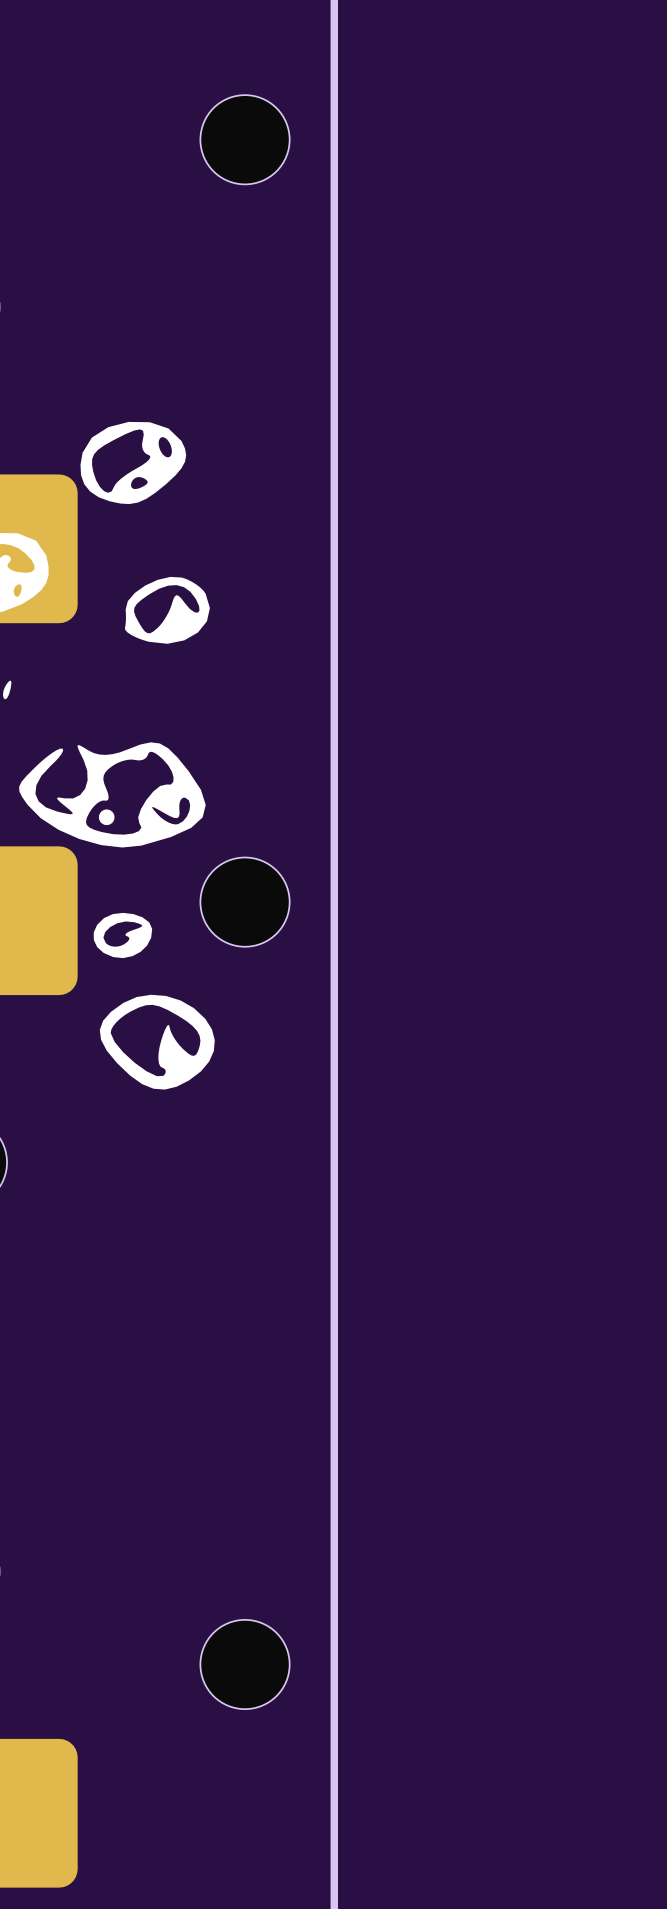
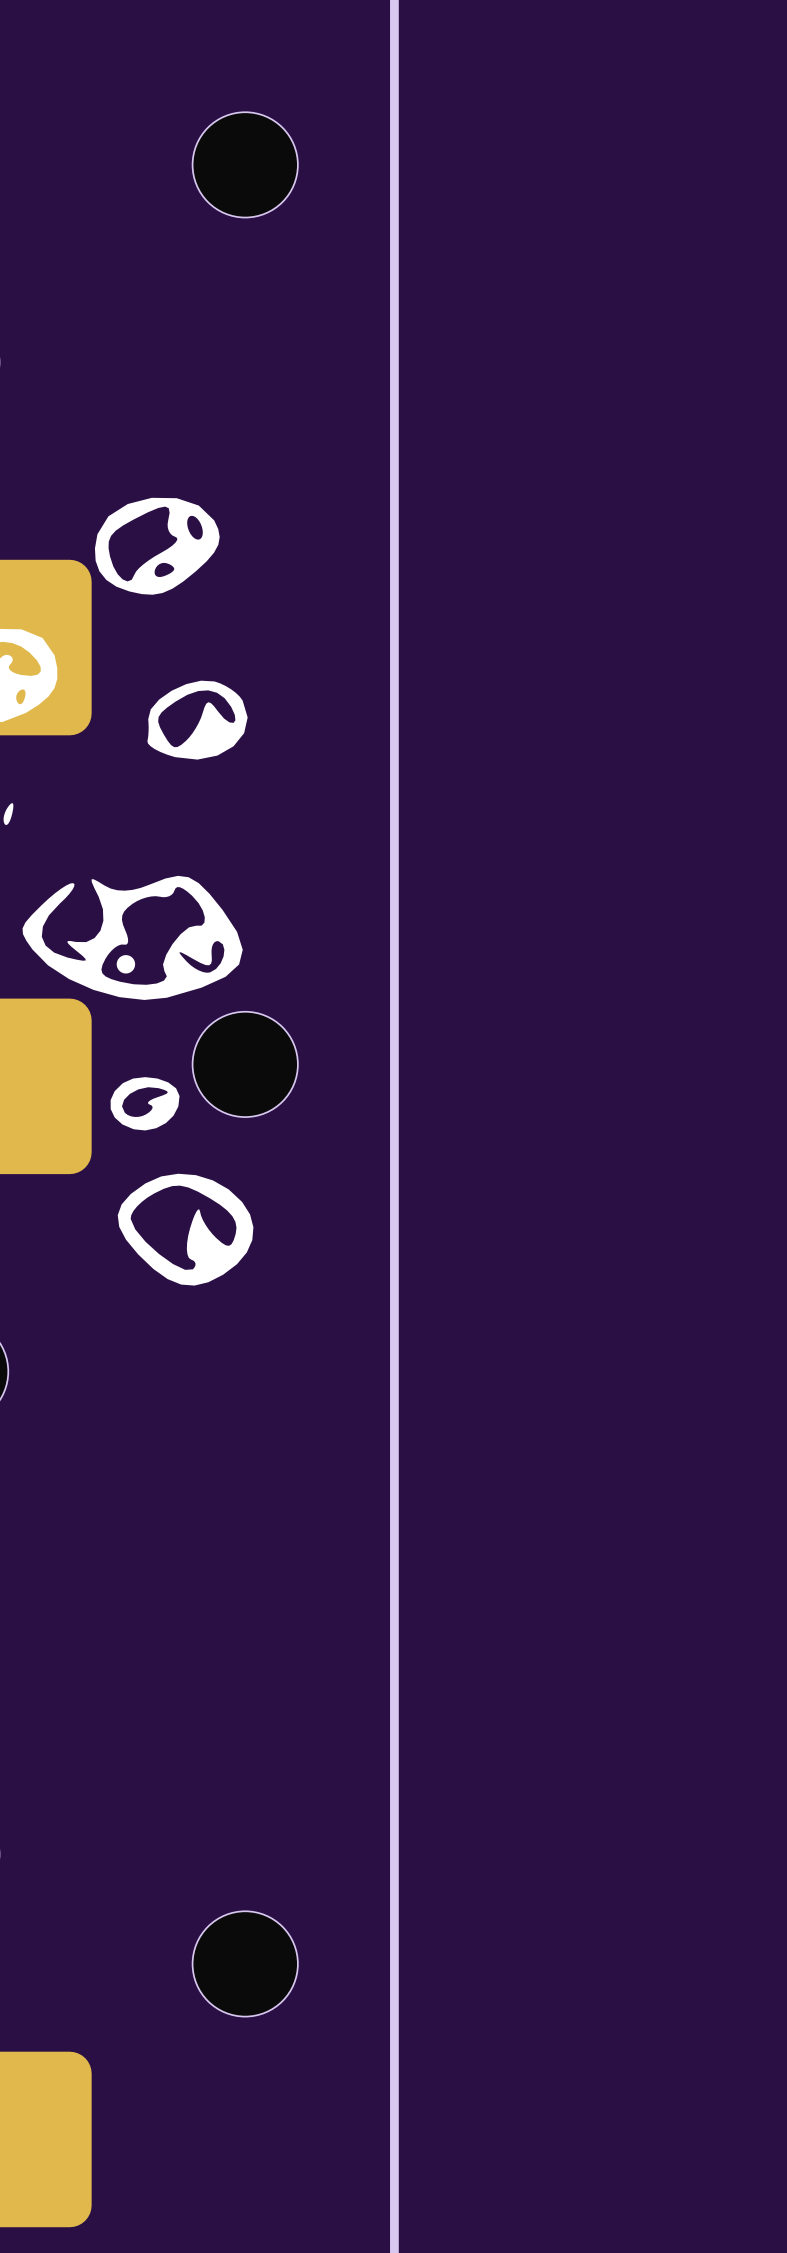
part position: (245, 139) -> (245, 164)
part position: (245, 902) -> (245, 1064)
part position: (245, 1664) -> (245, 1963)

